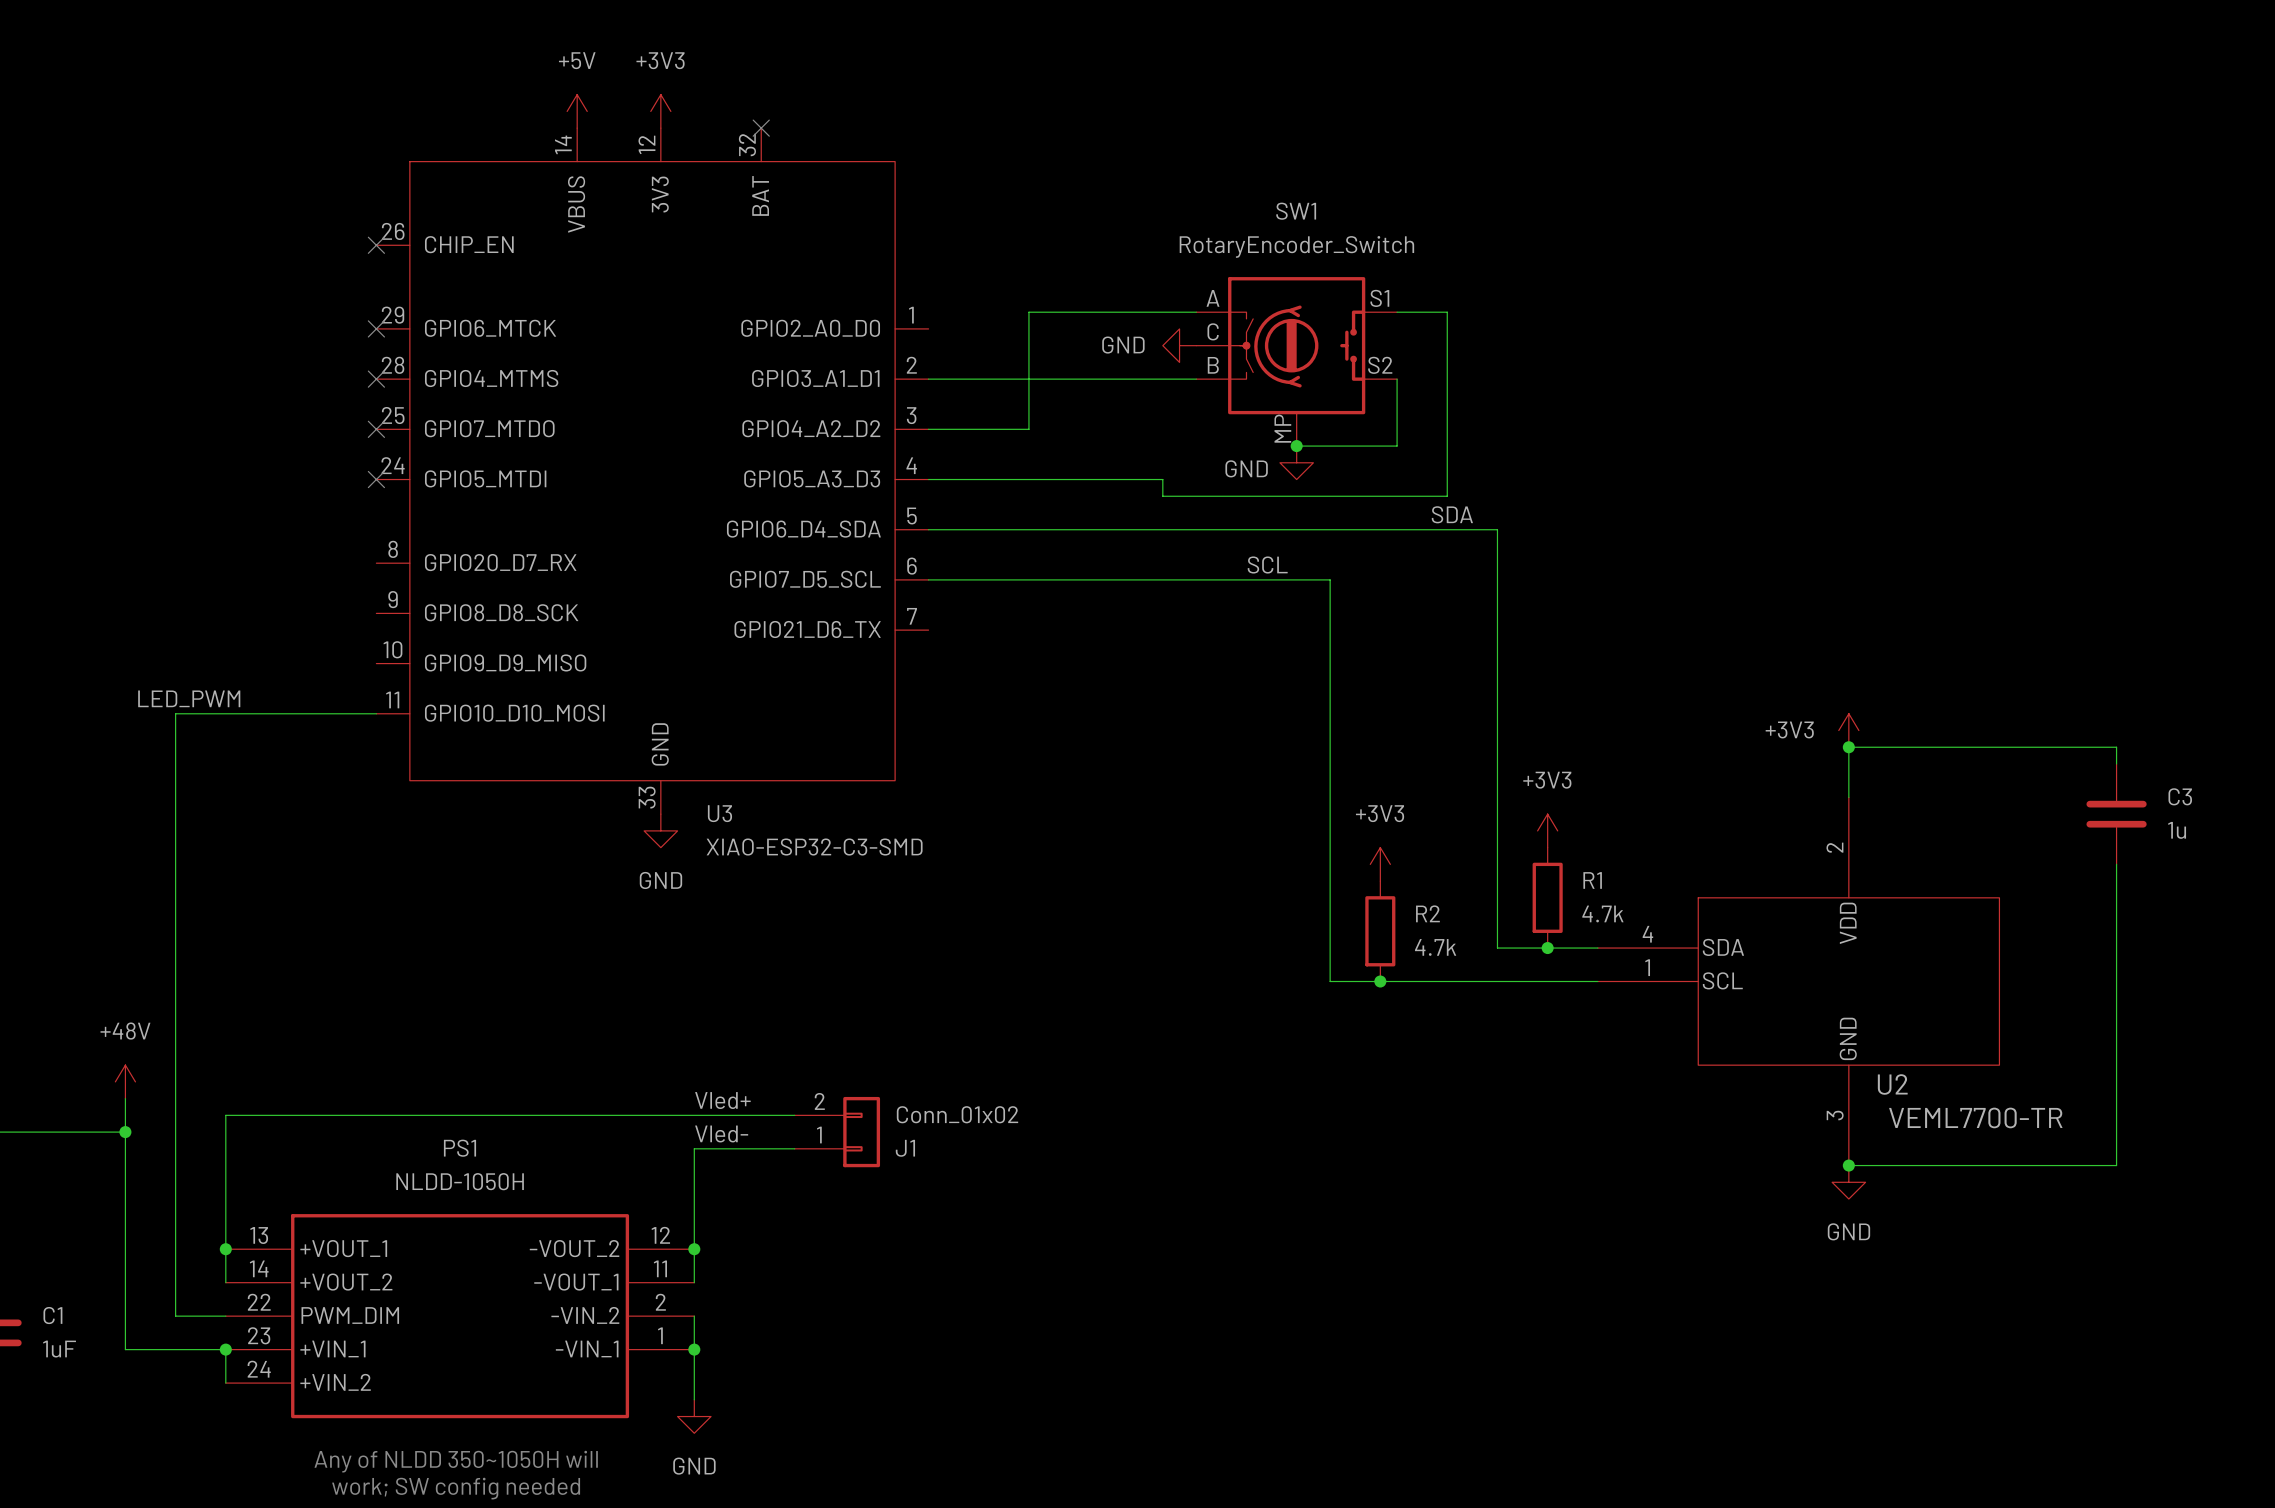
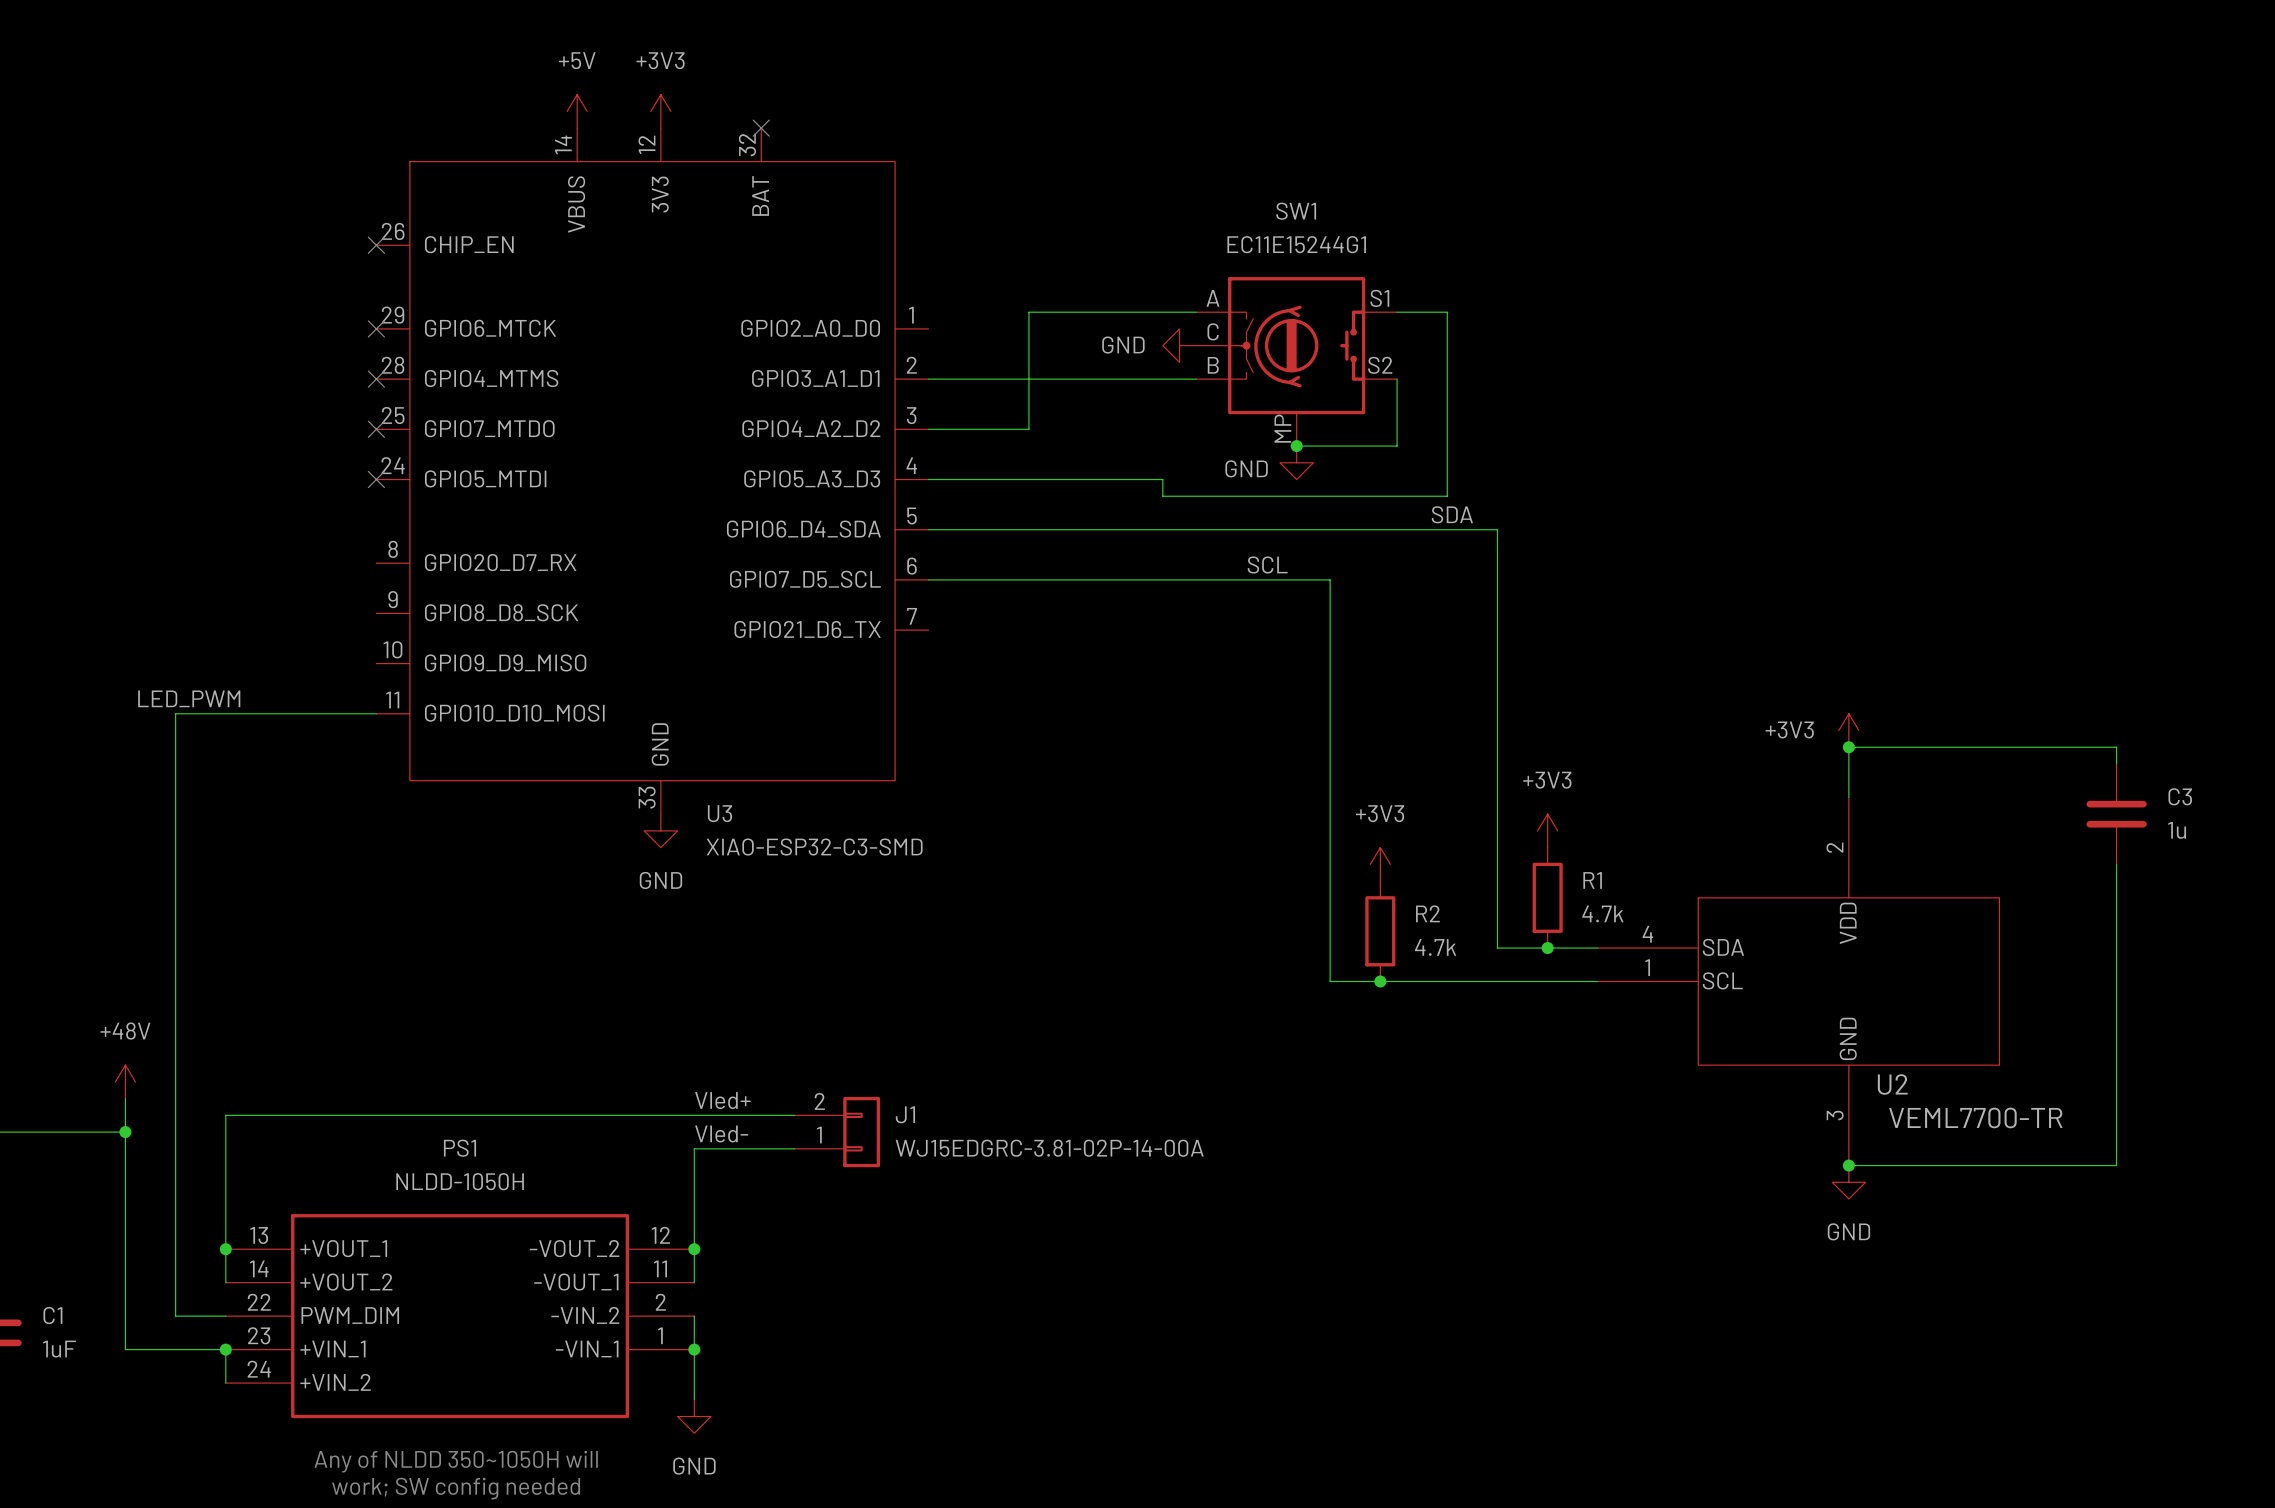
SW1 value: RotaryEncoder_Switch (1296, 246) -> EC11E15244G1 (1296, 244)
J1 value: Conn_01x02 (957, 1114) -> WJ15EDGRC-3.81-02P-14-00A (1049, 1148)
J1 name position: J1 (905, 1148) -> J1 (905, 1114)

